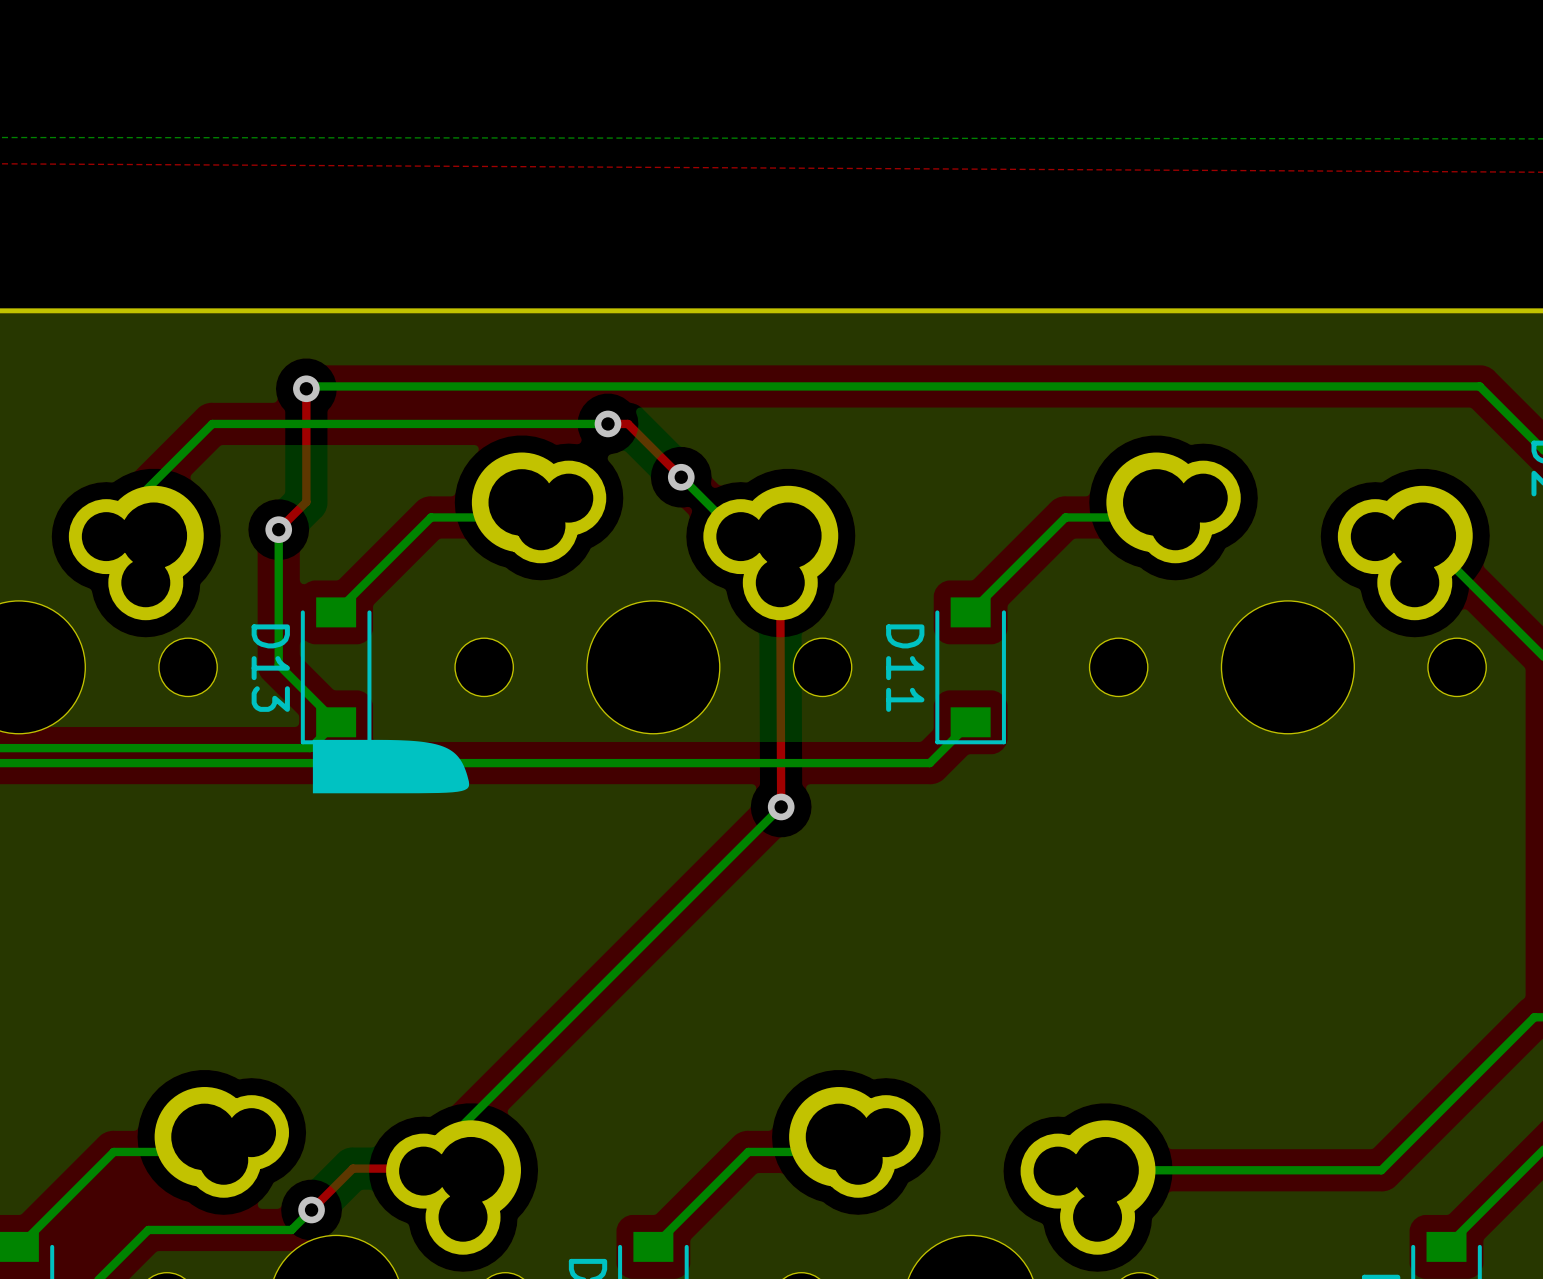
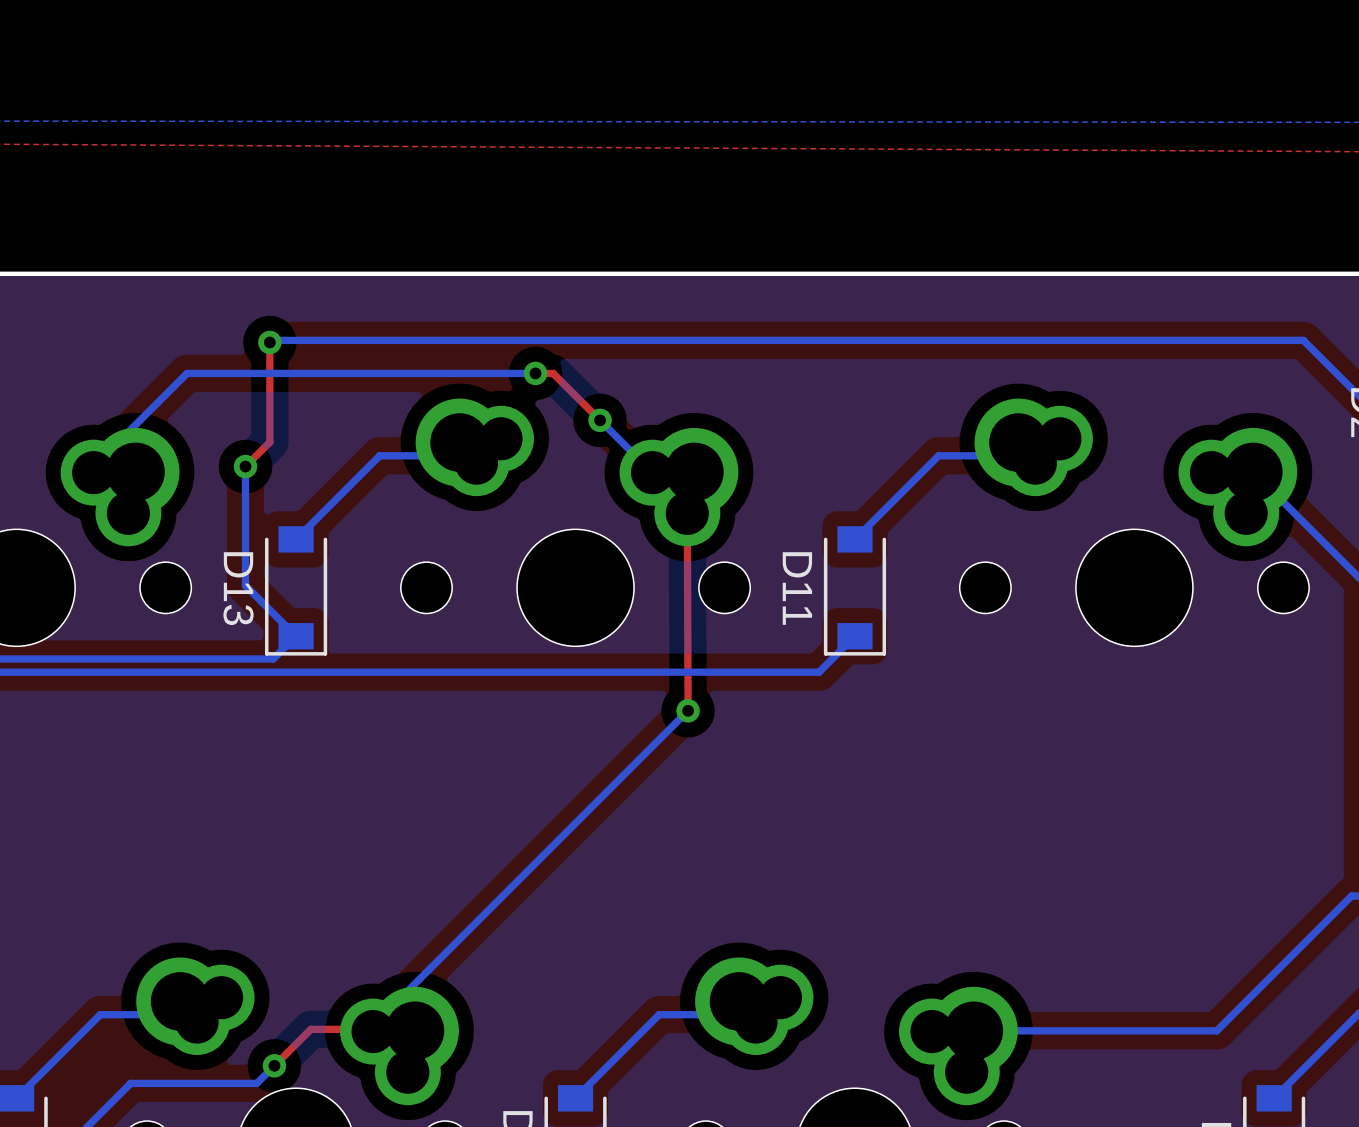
drawing: [312, 739, 470, 794] -> none

